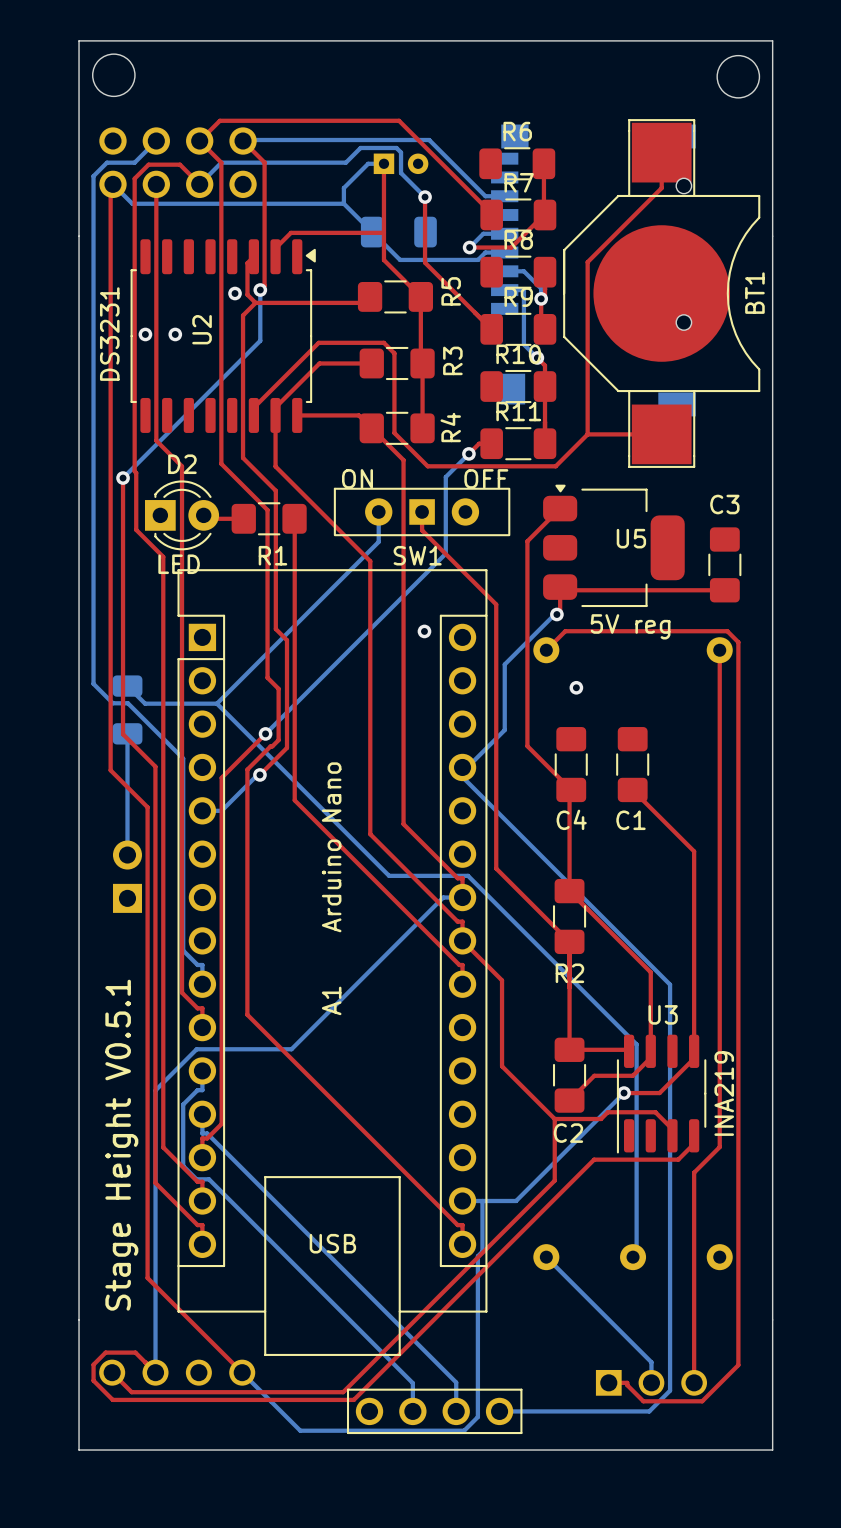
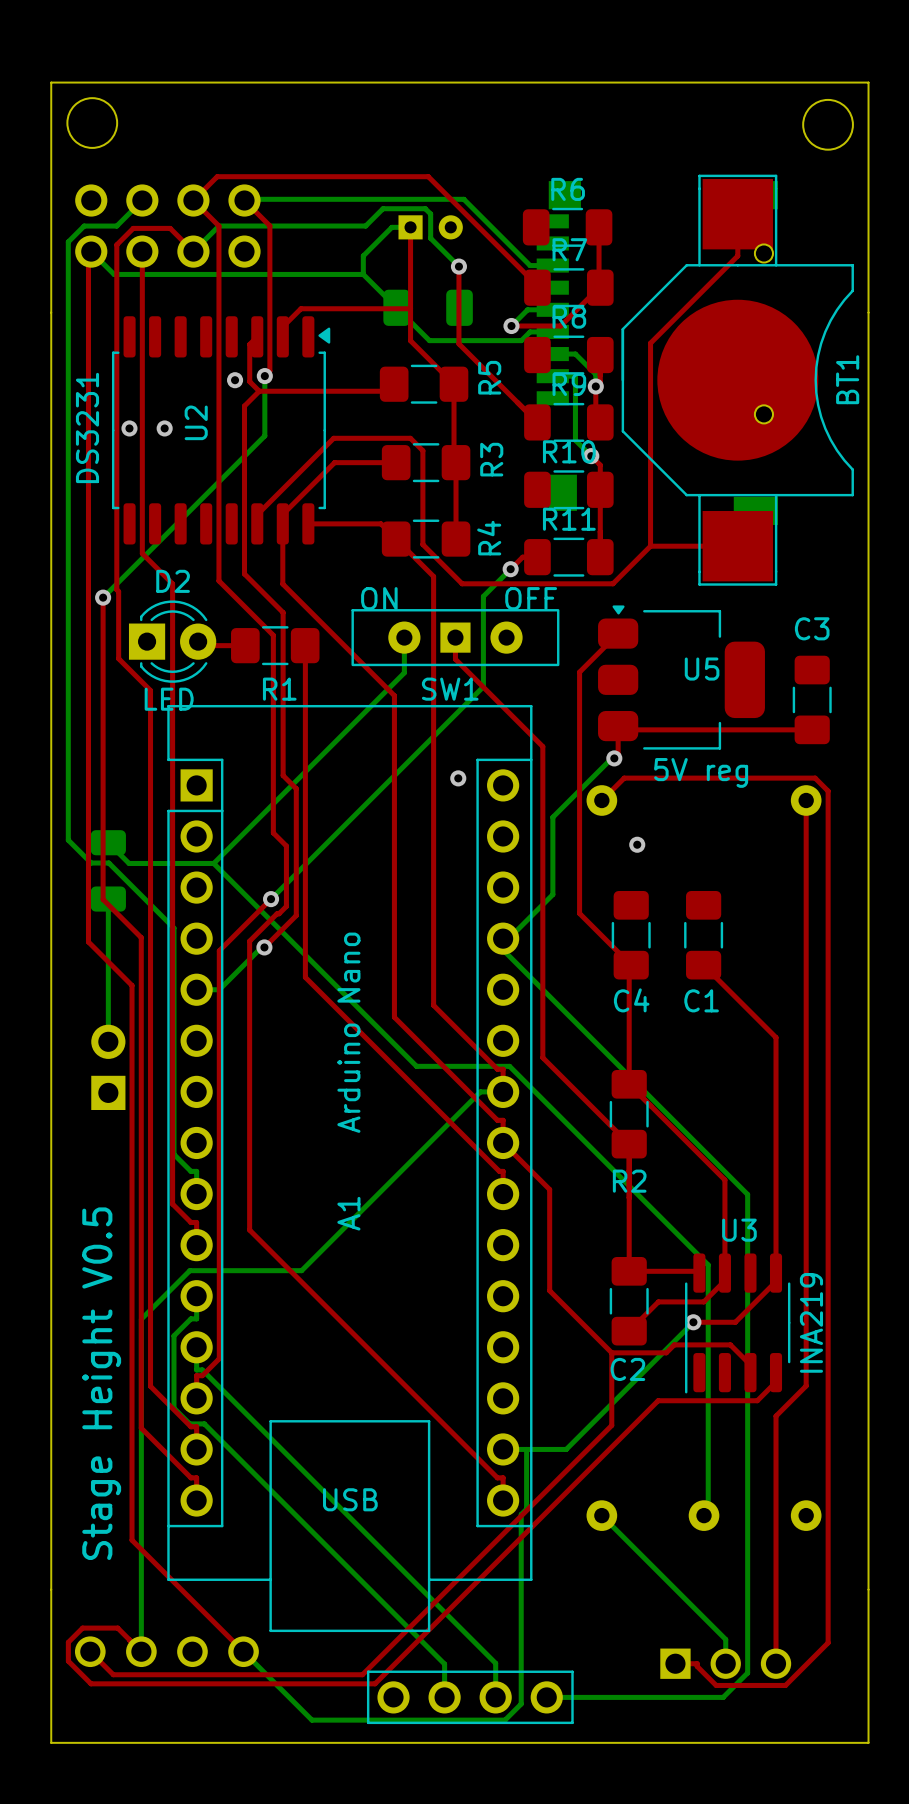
text: Stage Height V0.5.1 (121, 1145) -> Stage Height V0.5 (101, 1383)

